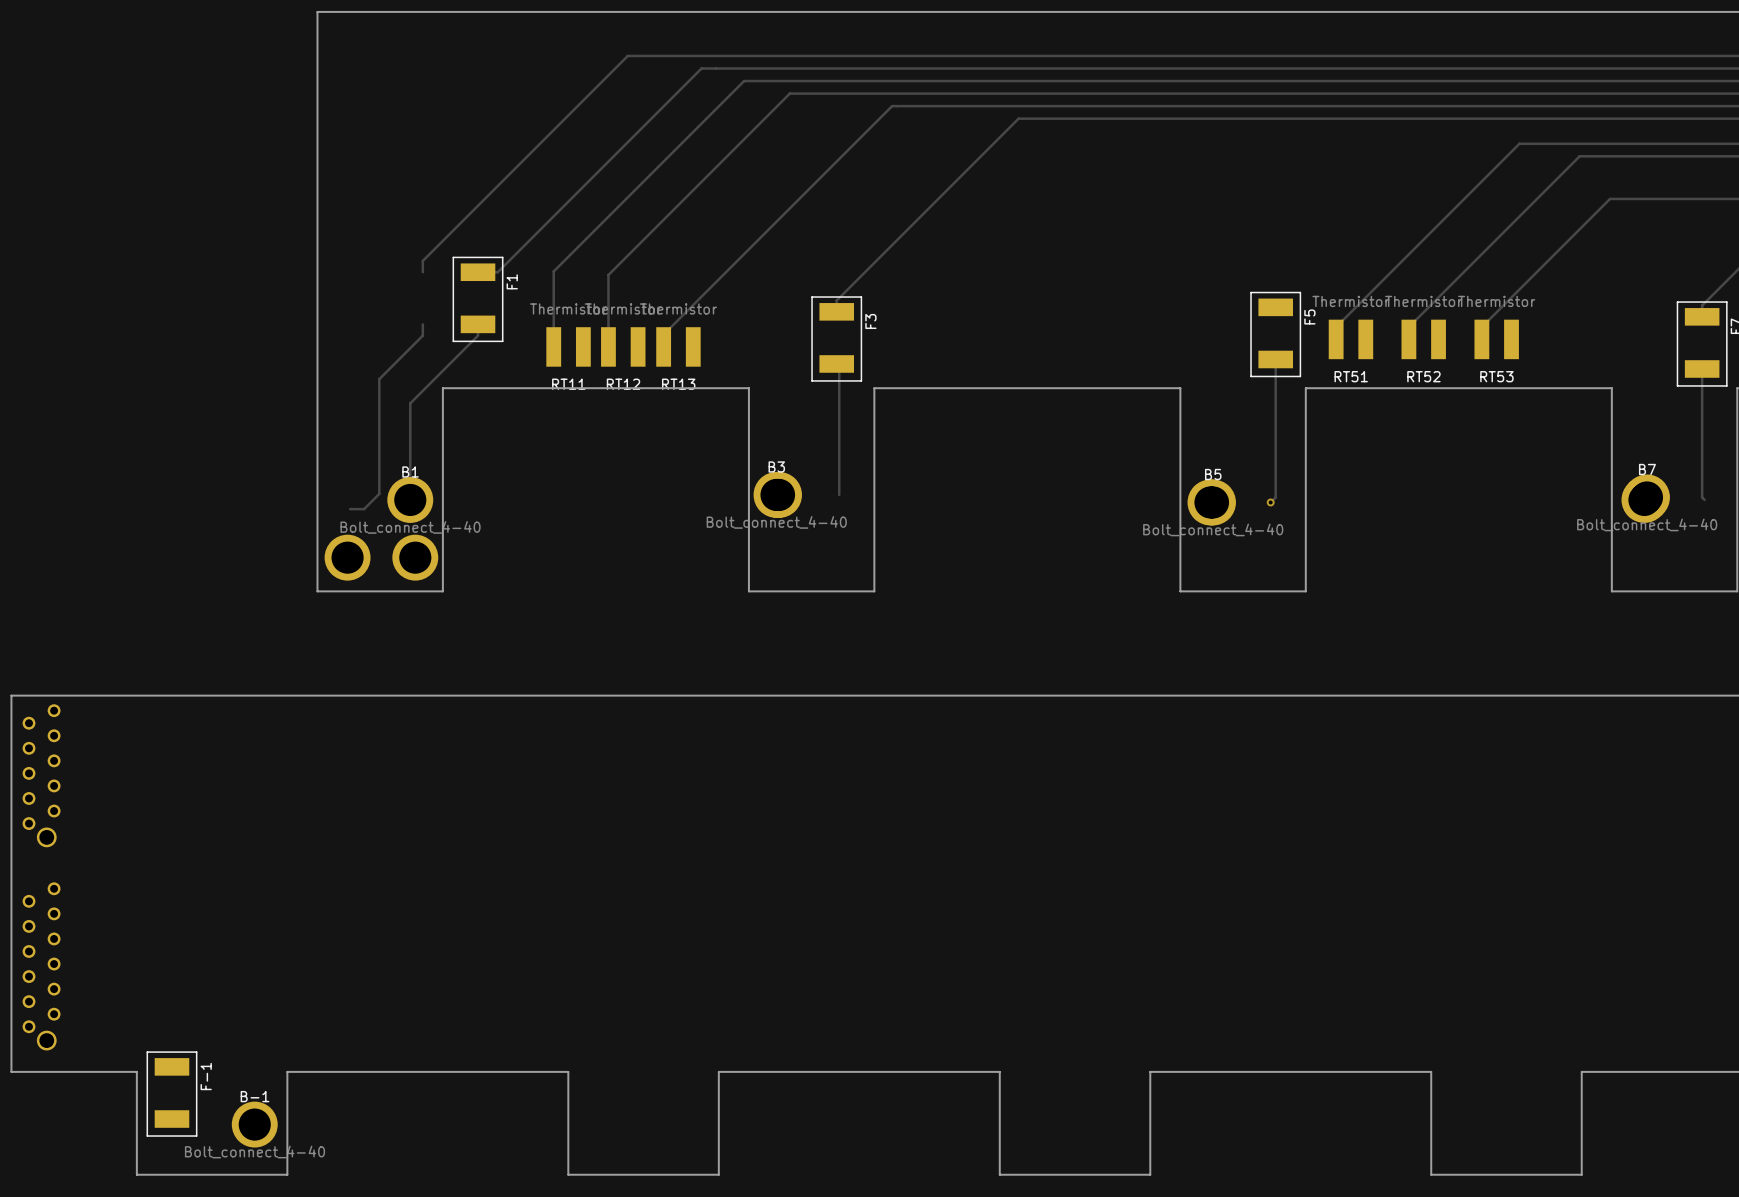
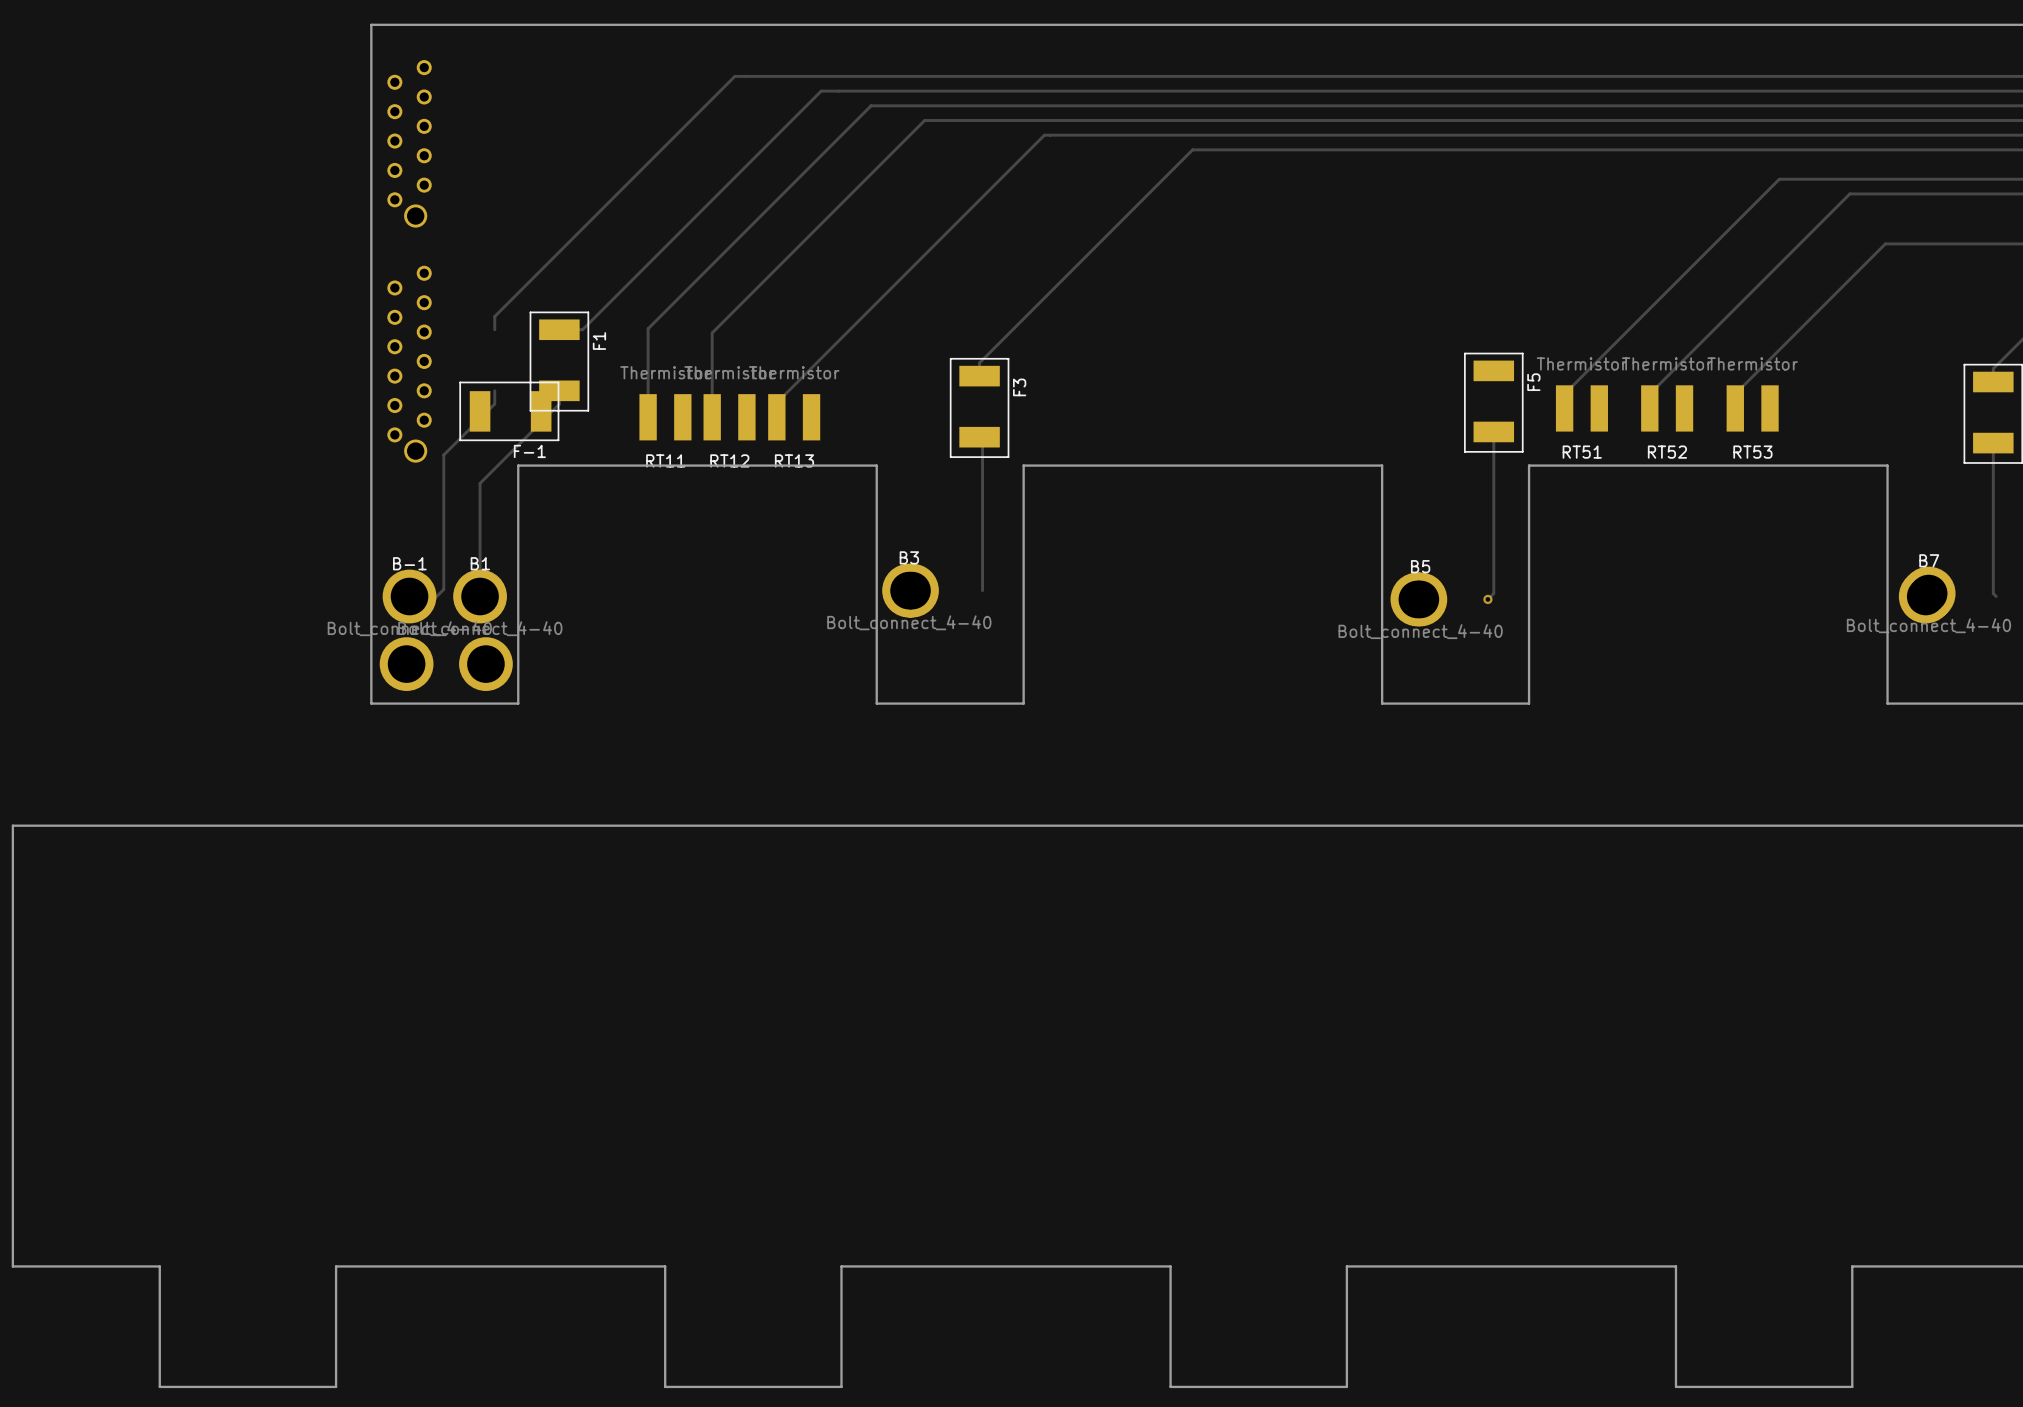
part: none -> (409, 143)
part: none -> (409, 364)
part: (41, 775) -> none
part: (41, 966) -> none
F-1 rotation: 0° (171, 1094) -> 90° clockwise (509, 411)
F-1 position: (171, 1094) -> (509, 411)
B-1 position: (254, 1124) -> (409, 596)

